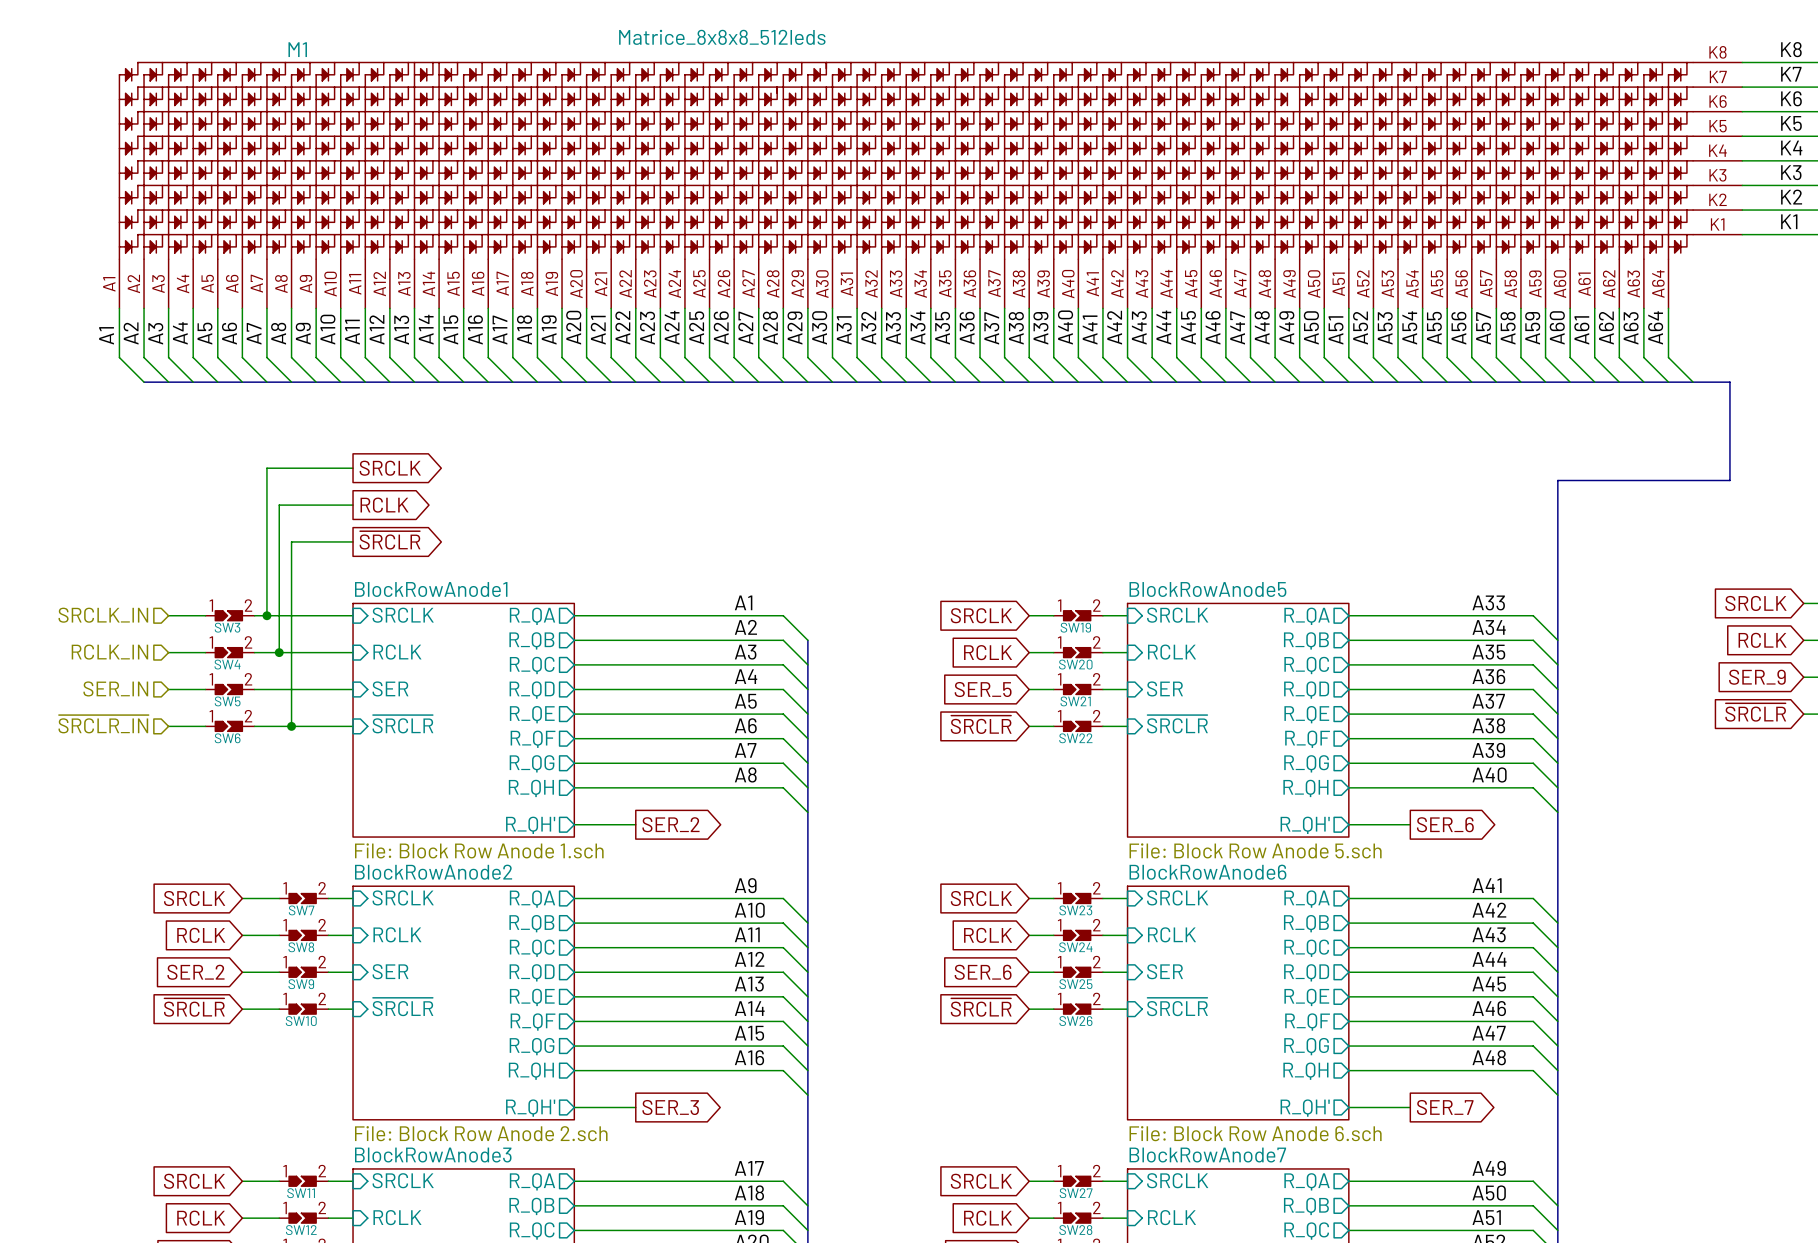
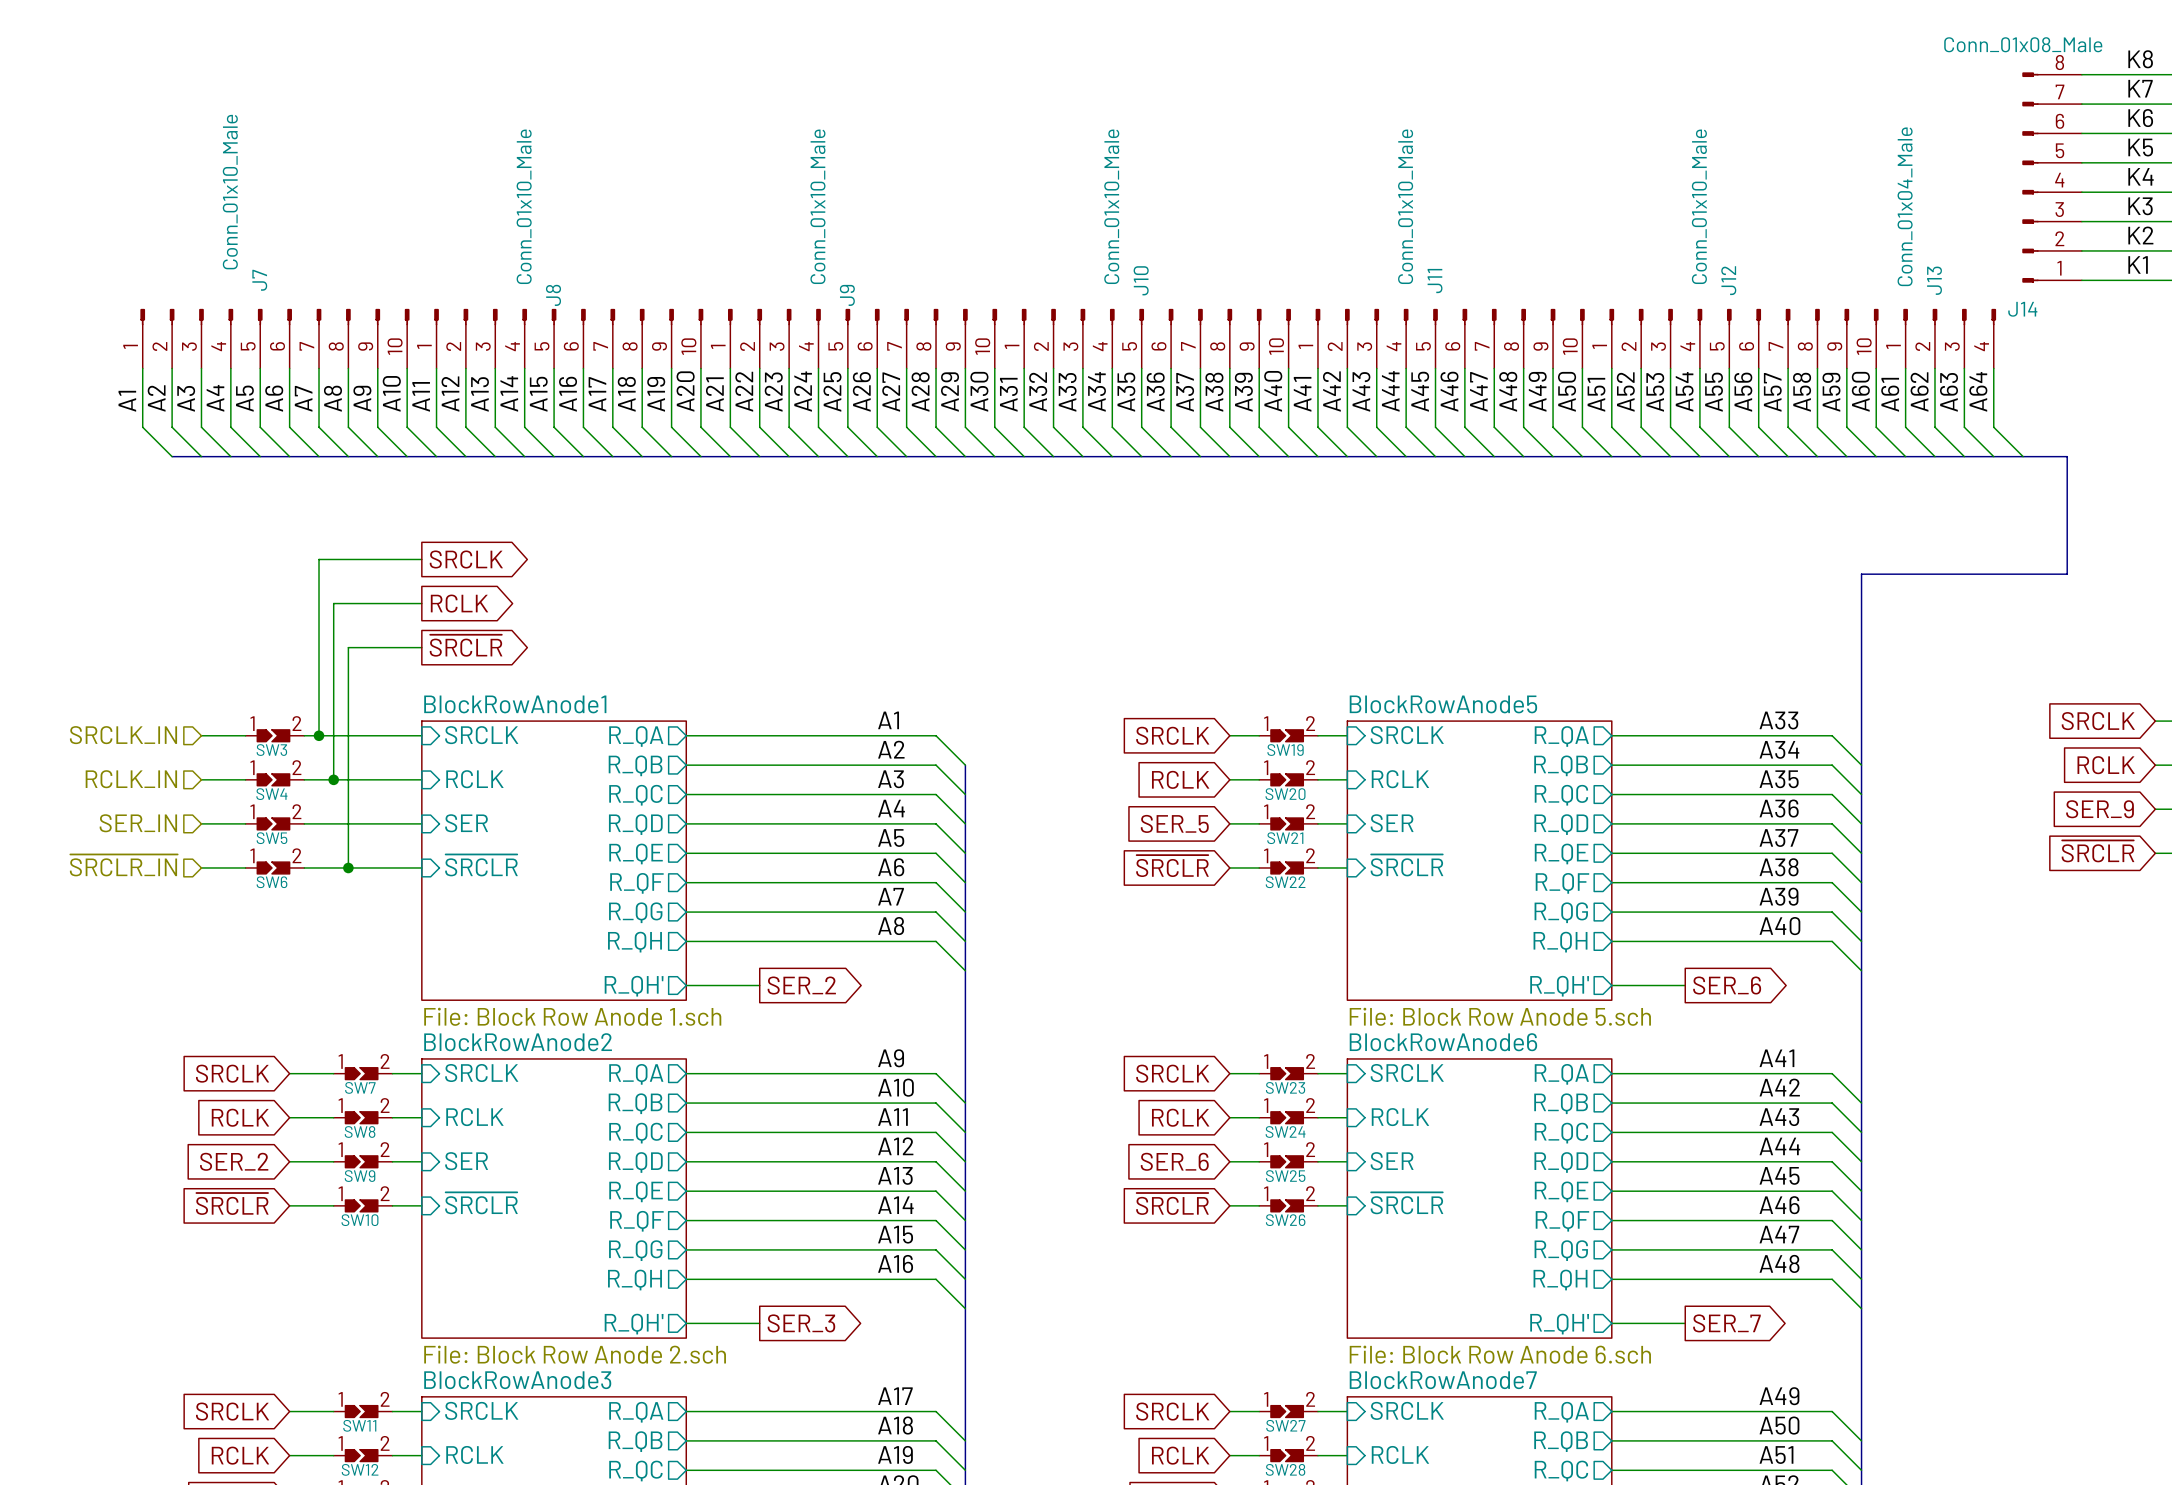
J14: none -> Conn_01x08_Male (2052, 177)
M1: Matrice_8x8x8_512leds (930, 185) -> none
J7: none -> Conn_01x10_Male (274, 338)
J8: none -> Conn_01x10_Male (568, 338)
J9: none -> Conn_01x10_Male (862, 338)
J10: none -> Conn_01x10_Male (1156, 338)
J11: none -> Conn_01x10_Male (1450, 338)
J12: none -> Conn_01x10_Male (1744, 338)
J13: none -> Conn_01x04_Male (1949, 338)

